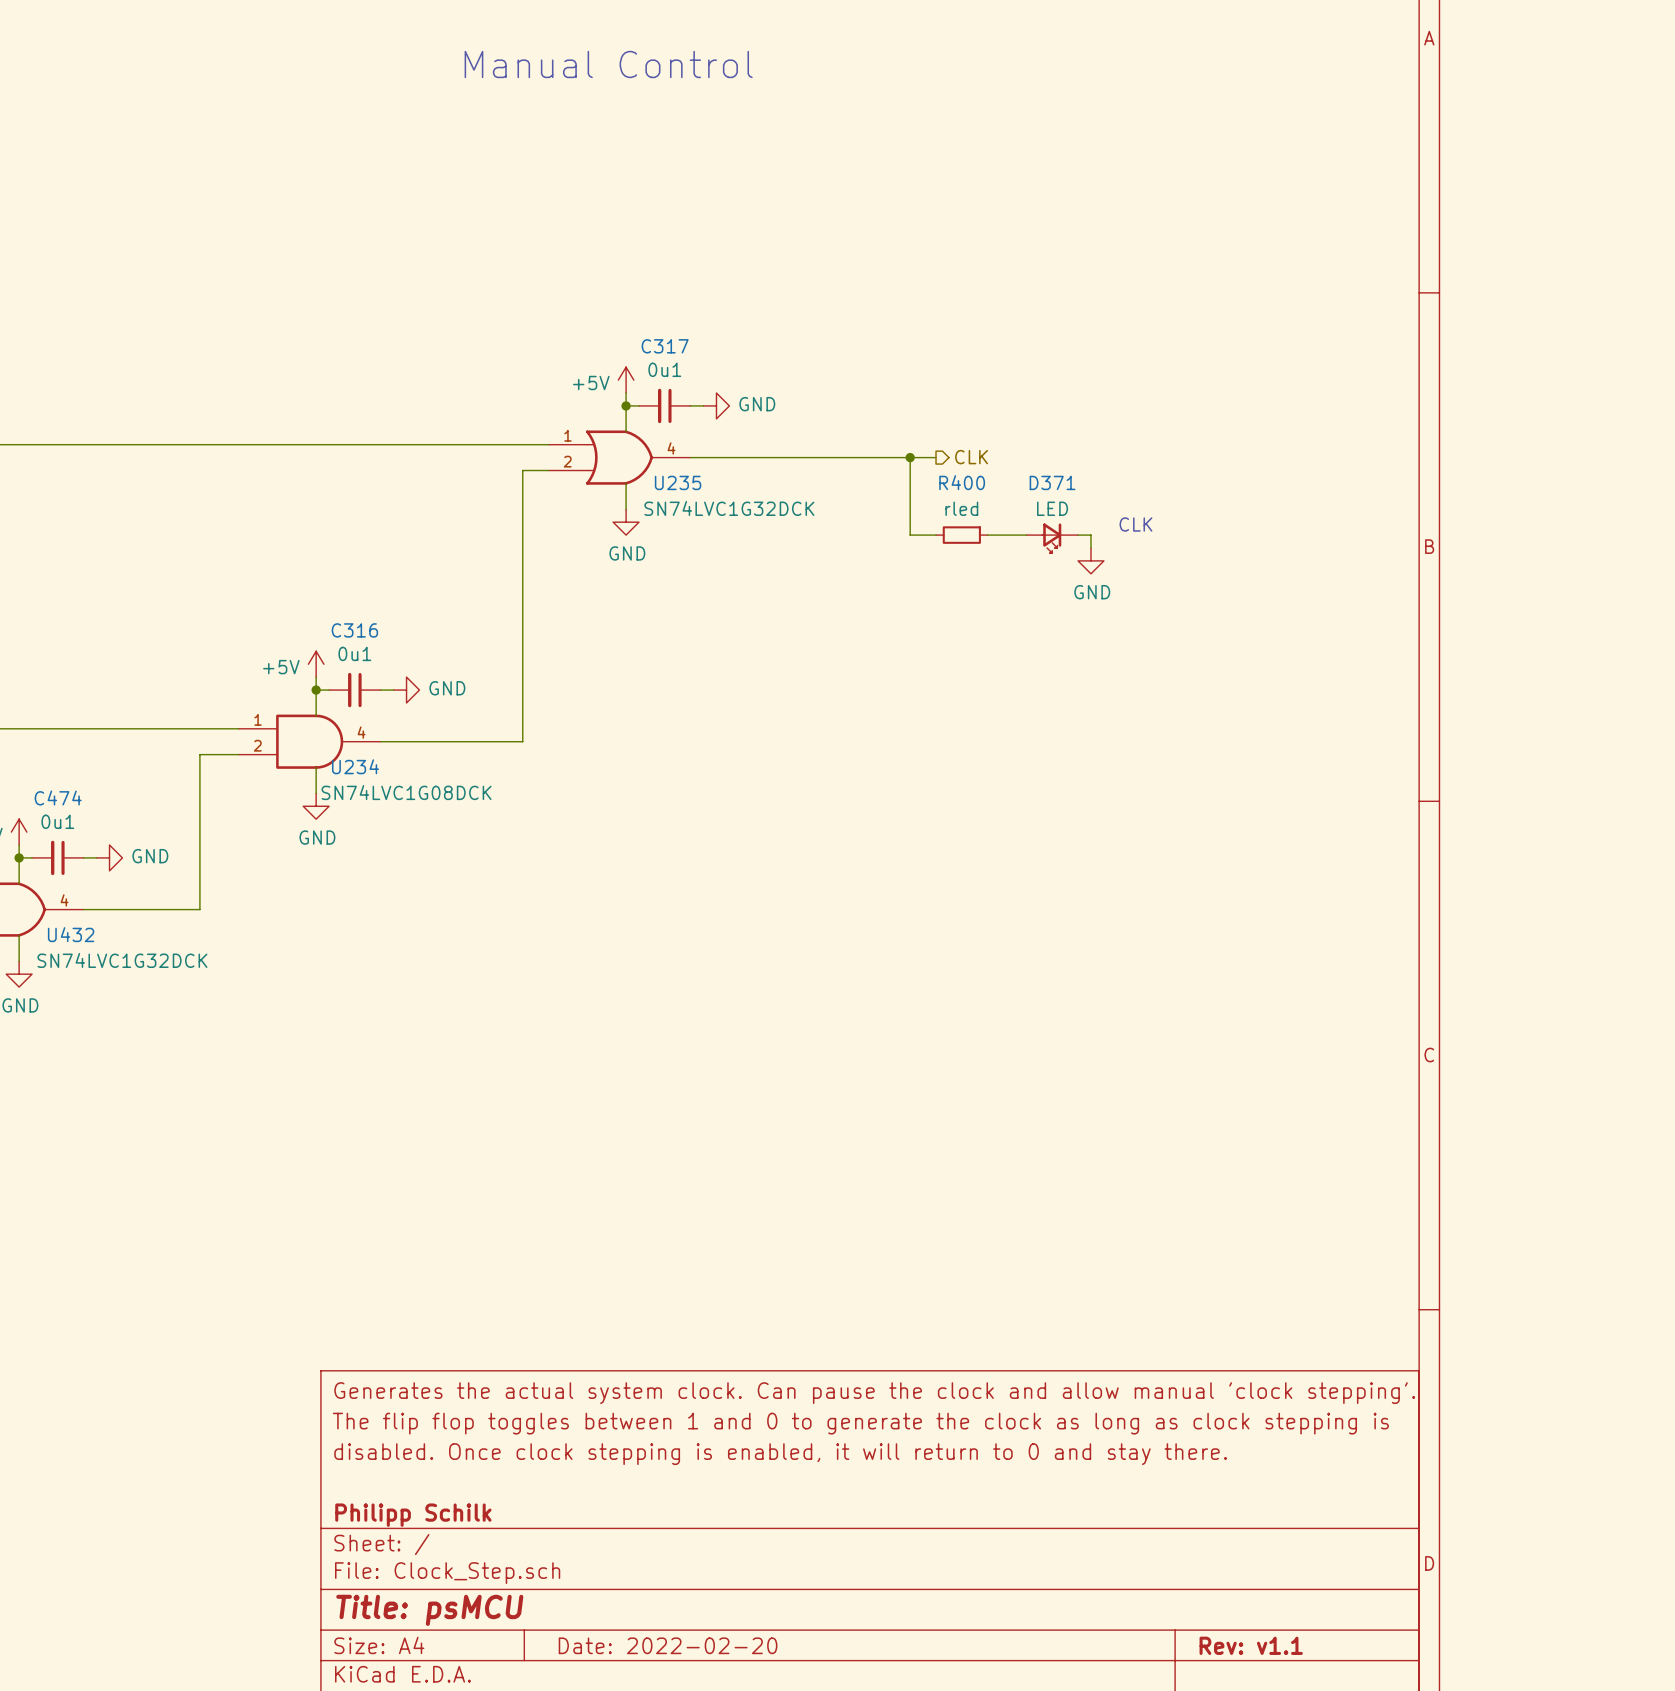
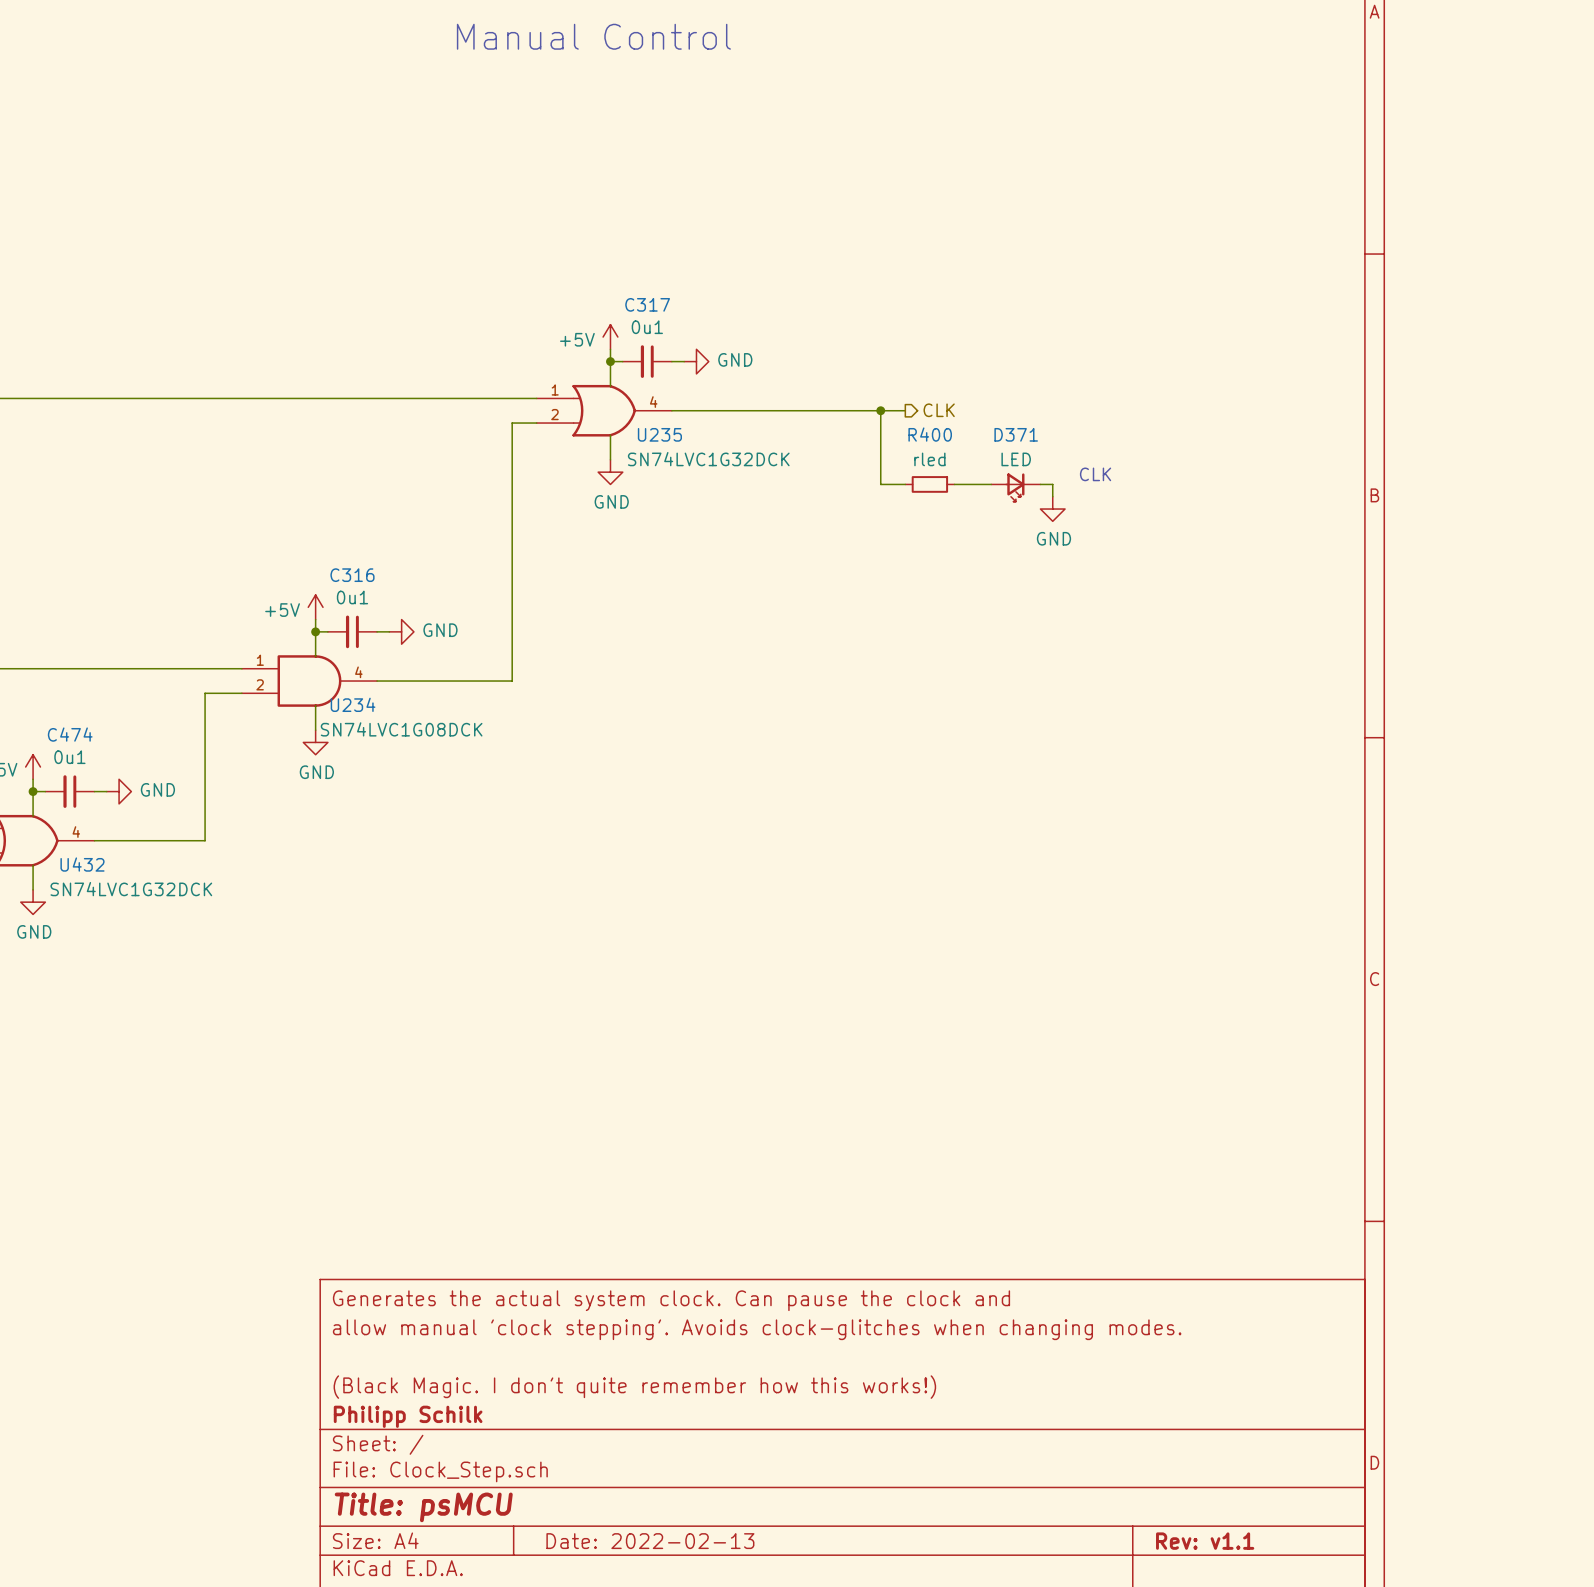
title block: Generates the actual system clock. Can pause the clock and allow manual 'clock stepping'. (874, 1393) -> Generates the actual system clock. Can pause the clock and (671, 1300)
title block: The flip flop toggles between 1 and 0 to generate the clock as long as clock stepping is (860, 1423) -> allow manual 'clock stepping'. Avoids clock-glitches when changing modes. (757, 1329)
title block: disabled. Once clock stepping is enabled, it will return to 0 and stay there. (780, 1454) -> none
title block: none -> (Black Magic. I don't quite remember how this works!) (634, 1387)
title block: Date: 2022-02-20 (668, 1645) -> Date: 2022-02-13 (650, 1541)

